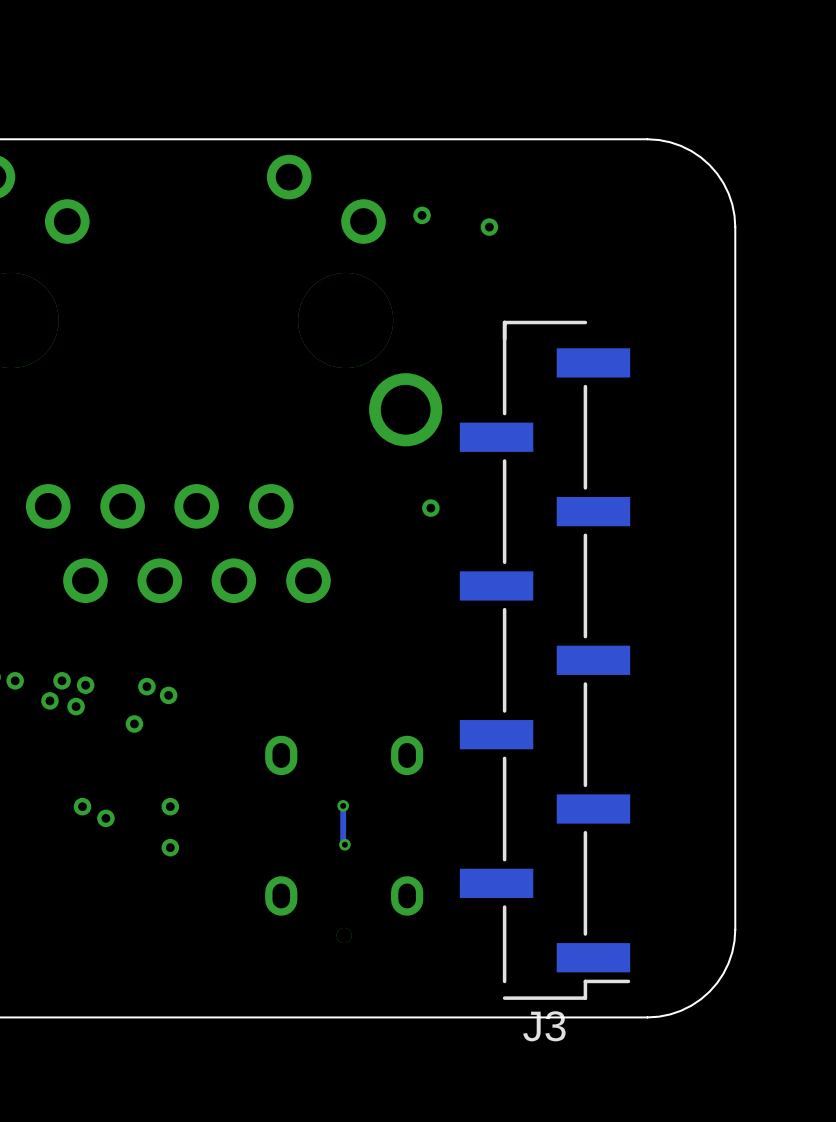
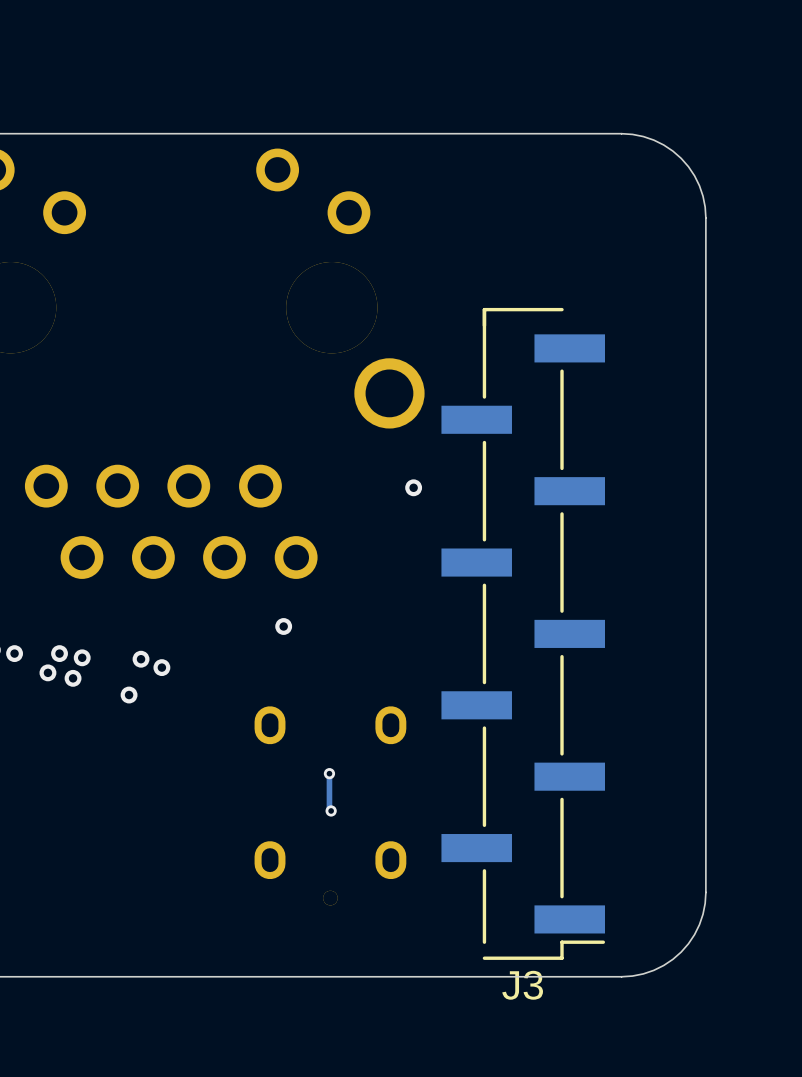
via: (422, 215) -> none
via: (489, 227) -> none
via: none -> (283, 626)
via: (82, 806) -> none
via: (170, 806) -> none
via: (105, 818) -> none
via: (170, 847) -> none

